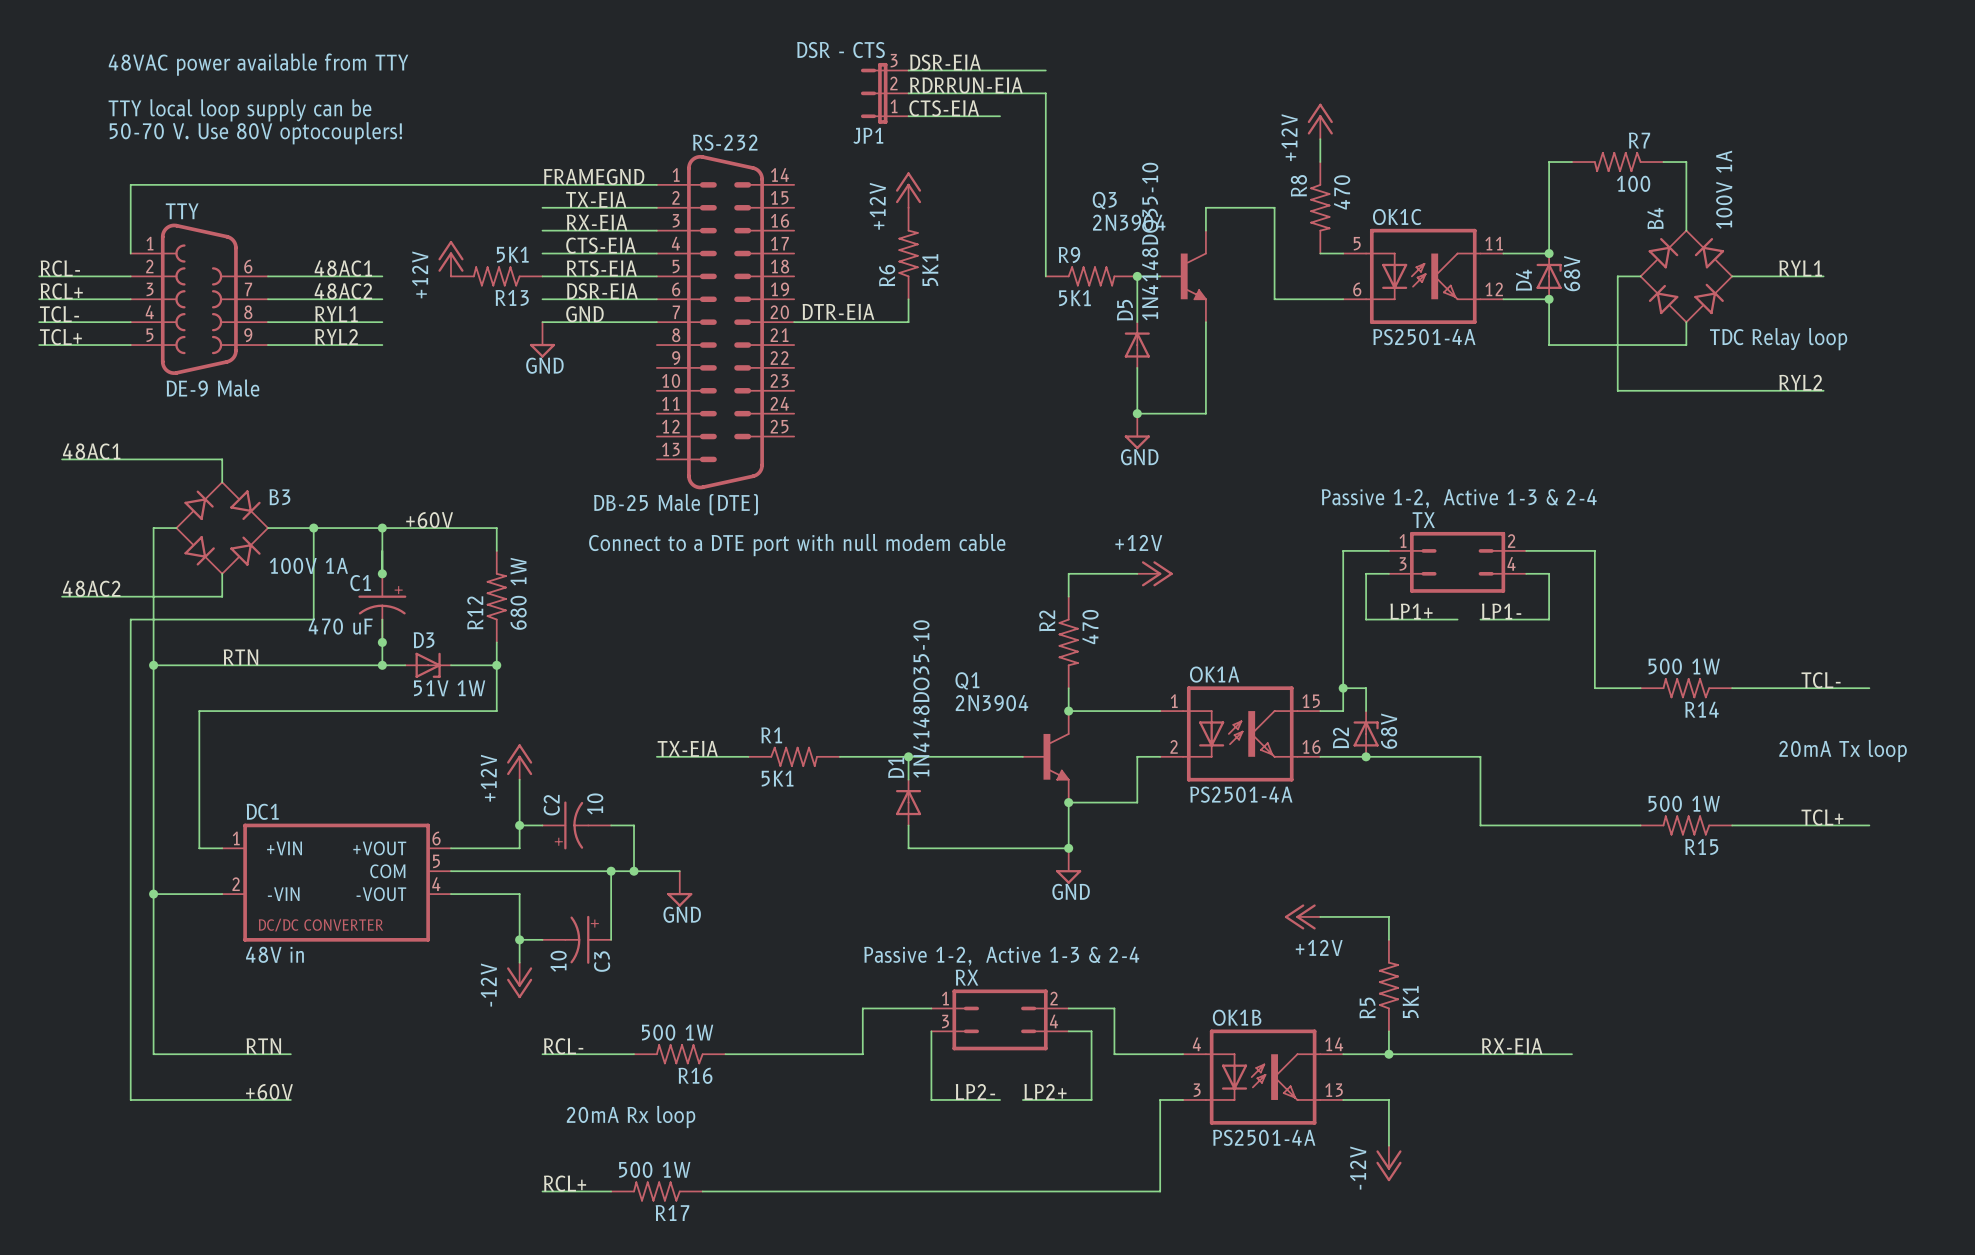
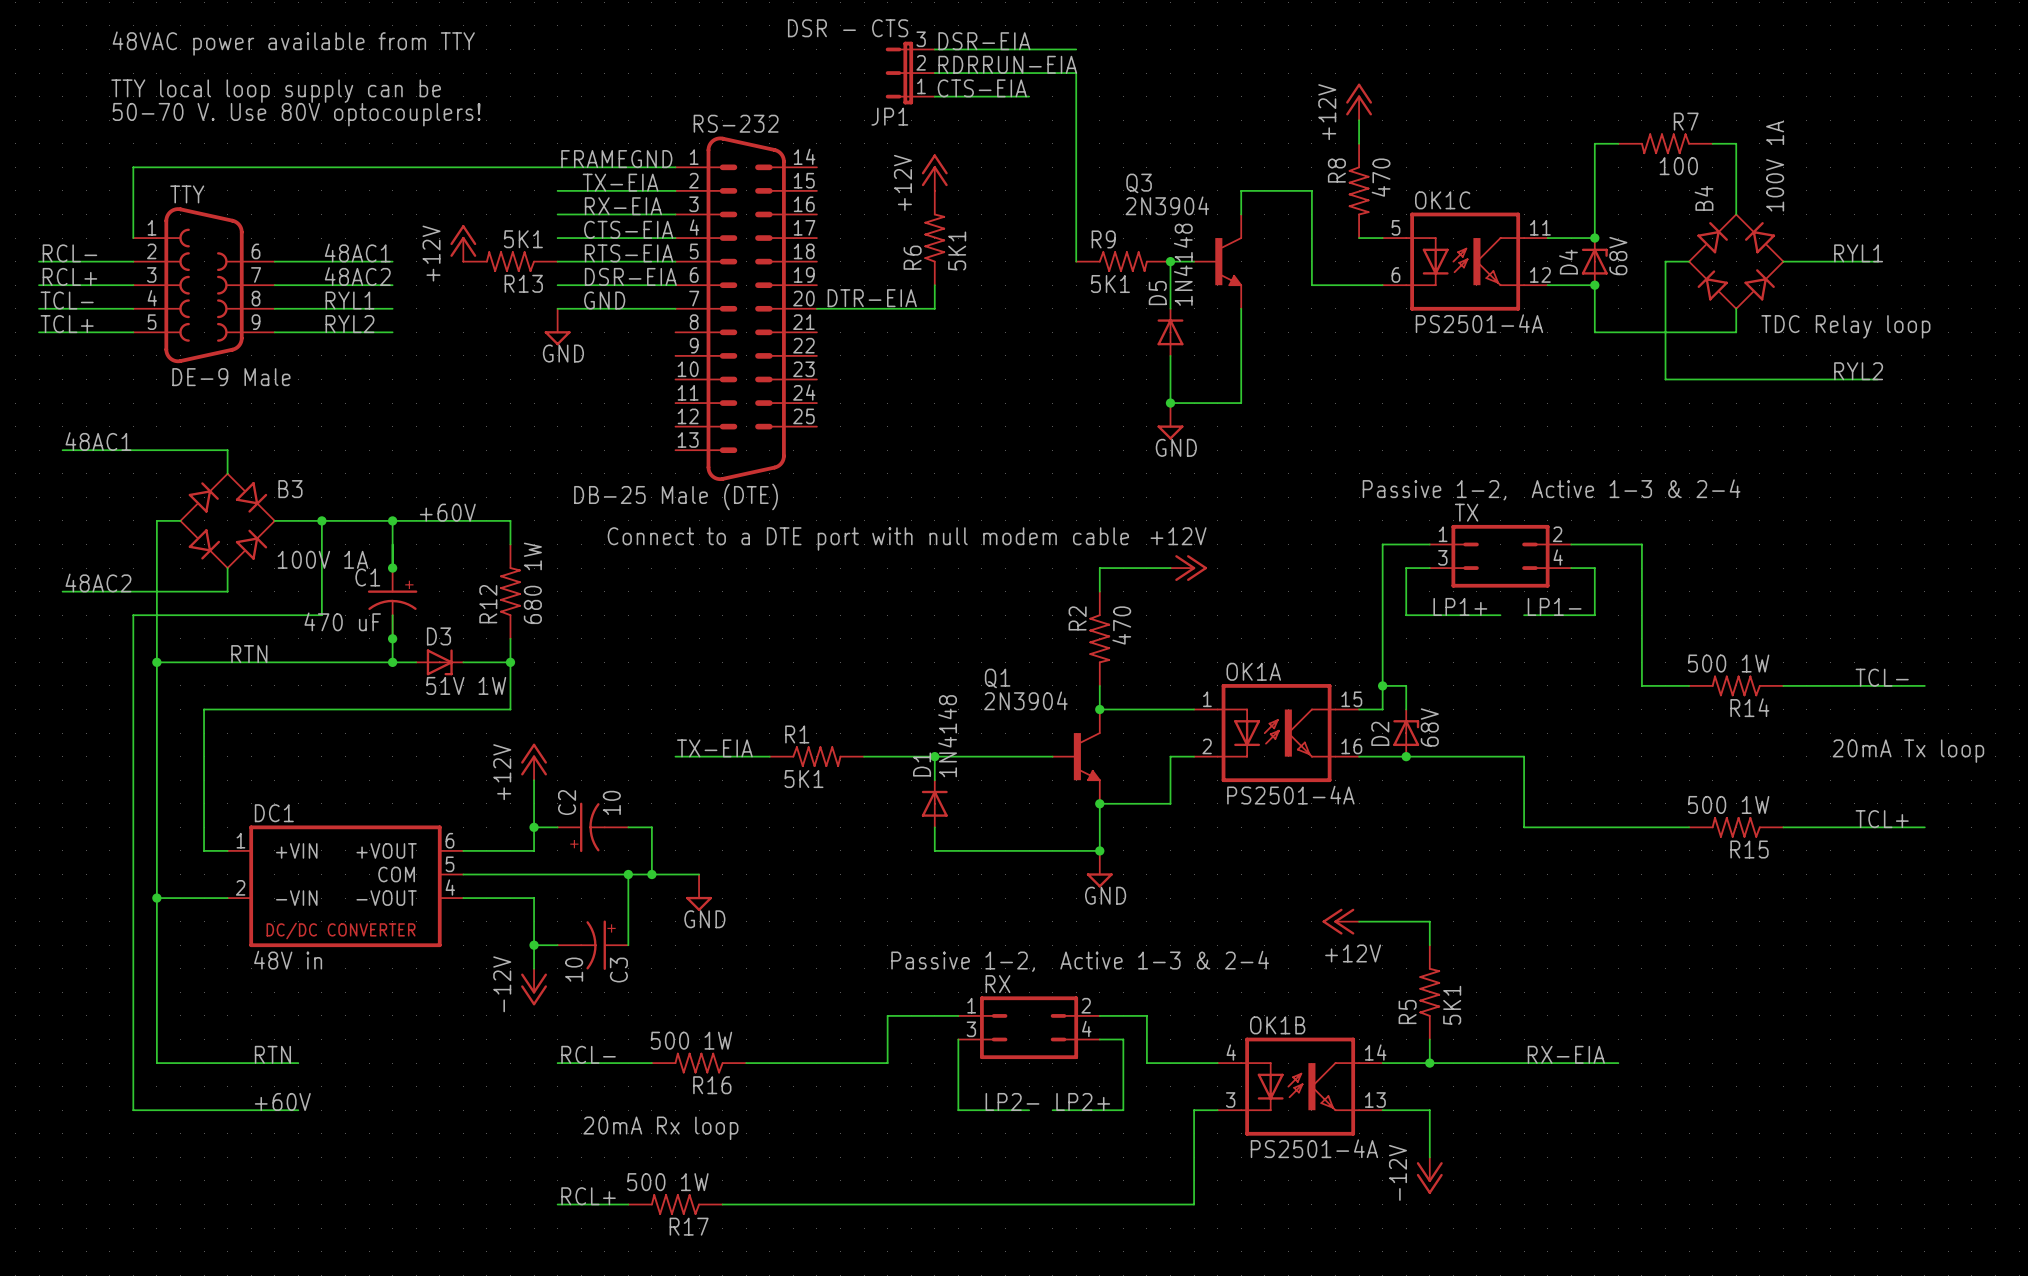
D5 value: 1N4148DO35-10 (1150, 241) -> 1N4148 (1183, 264)
D1 value: 1N4148DO35-10 (921, 699) -> 1N4148 (947, 736)

